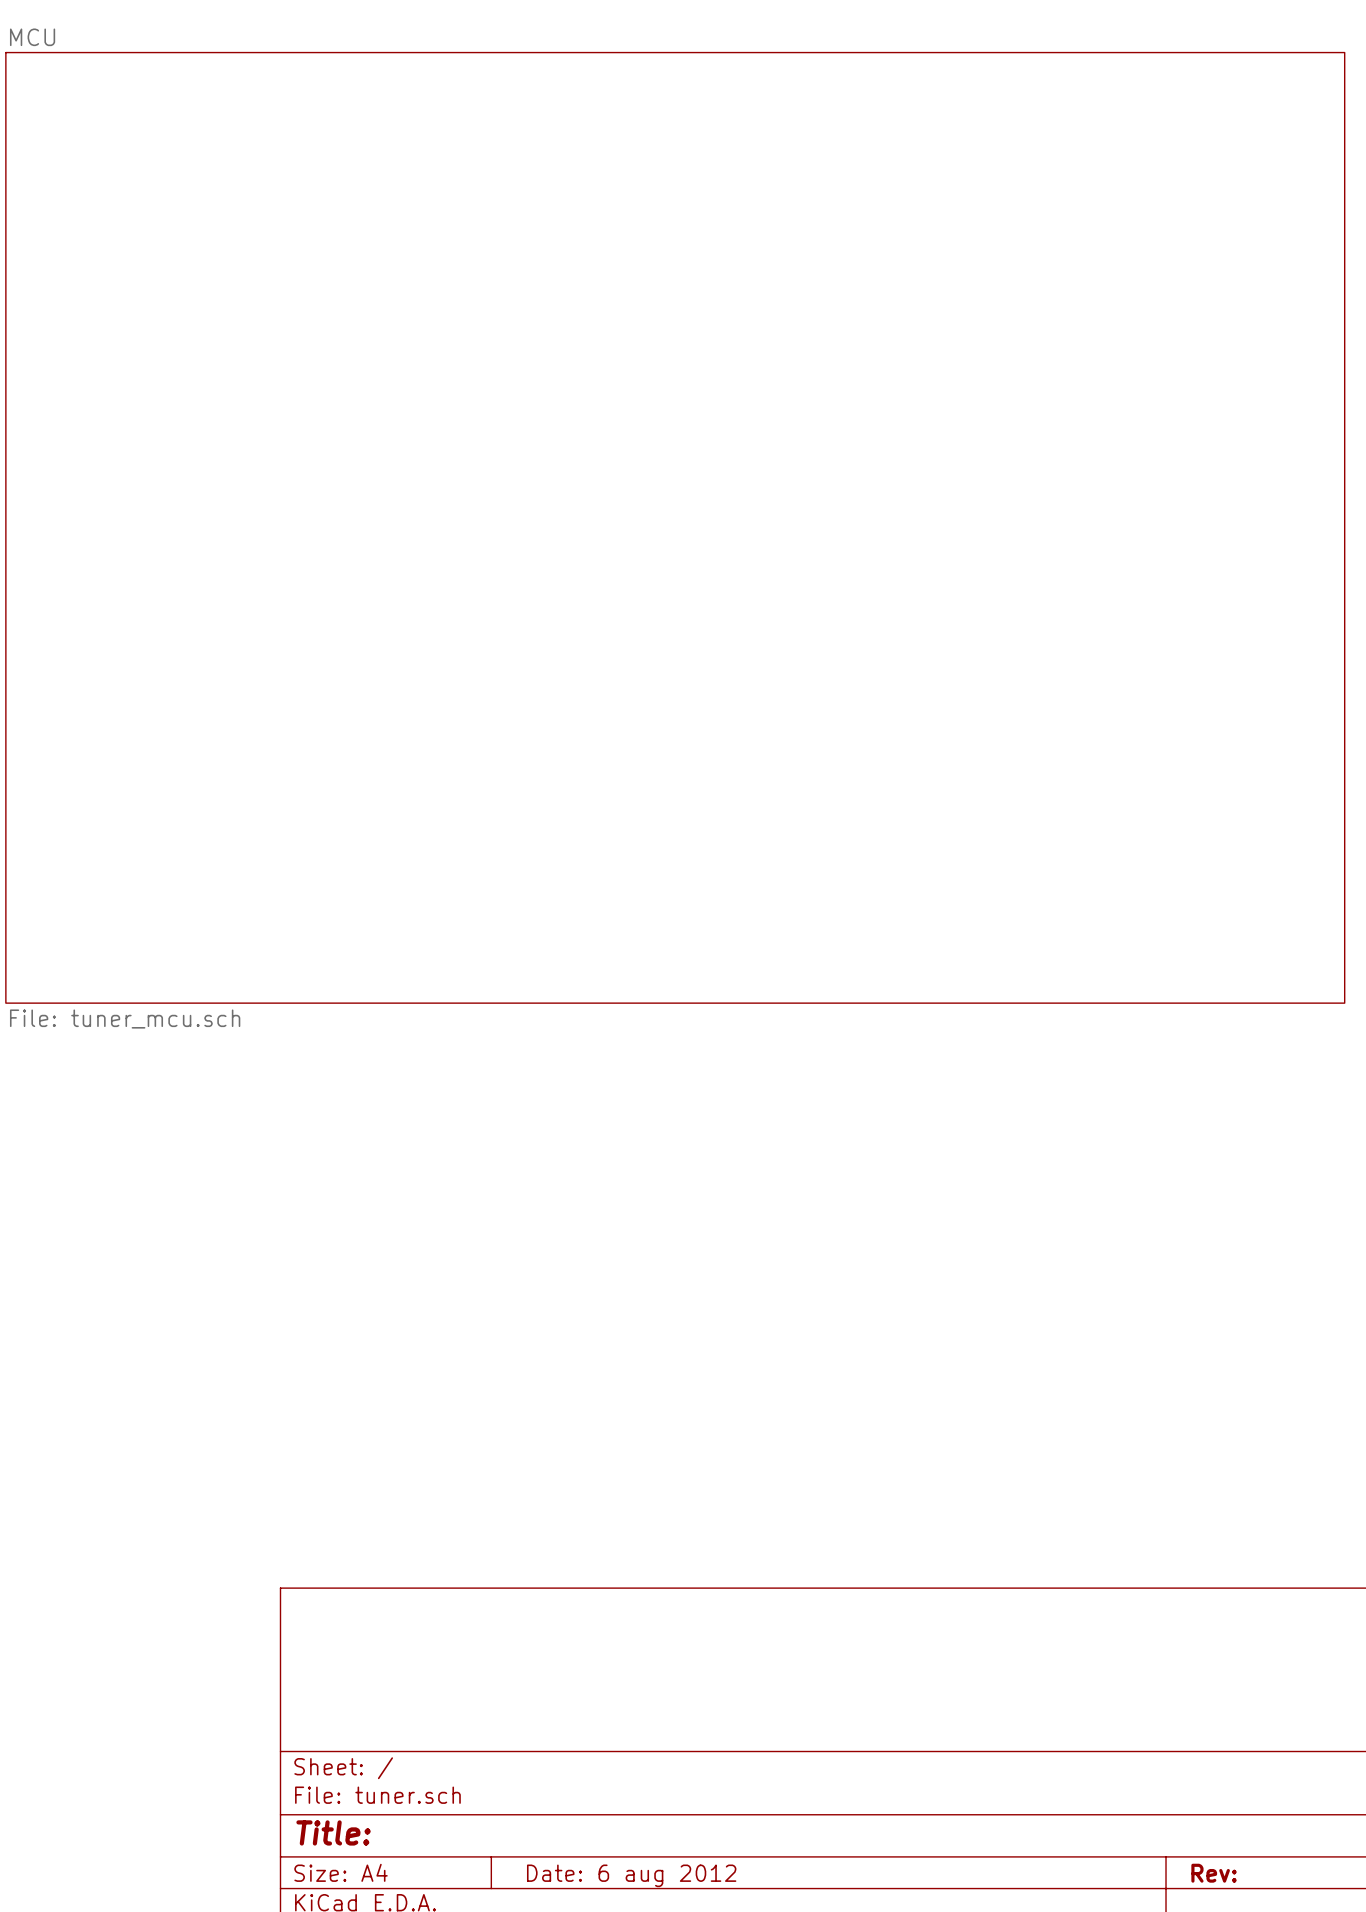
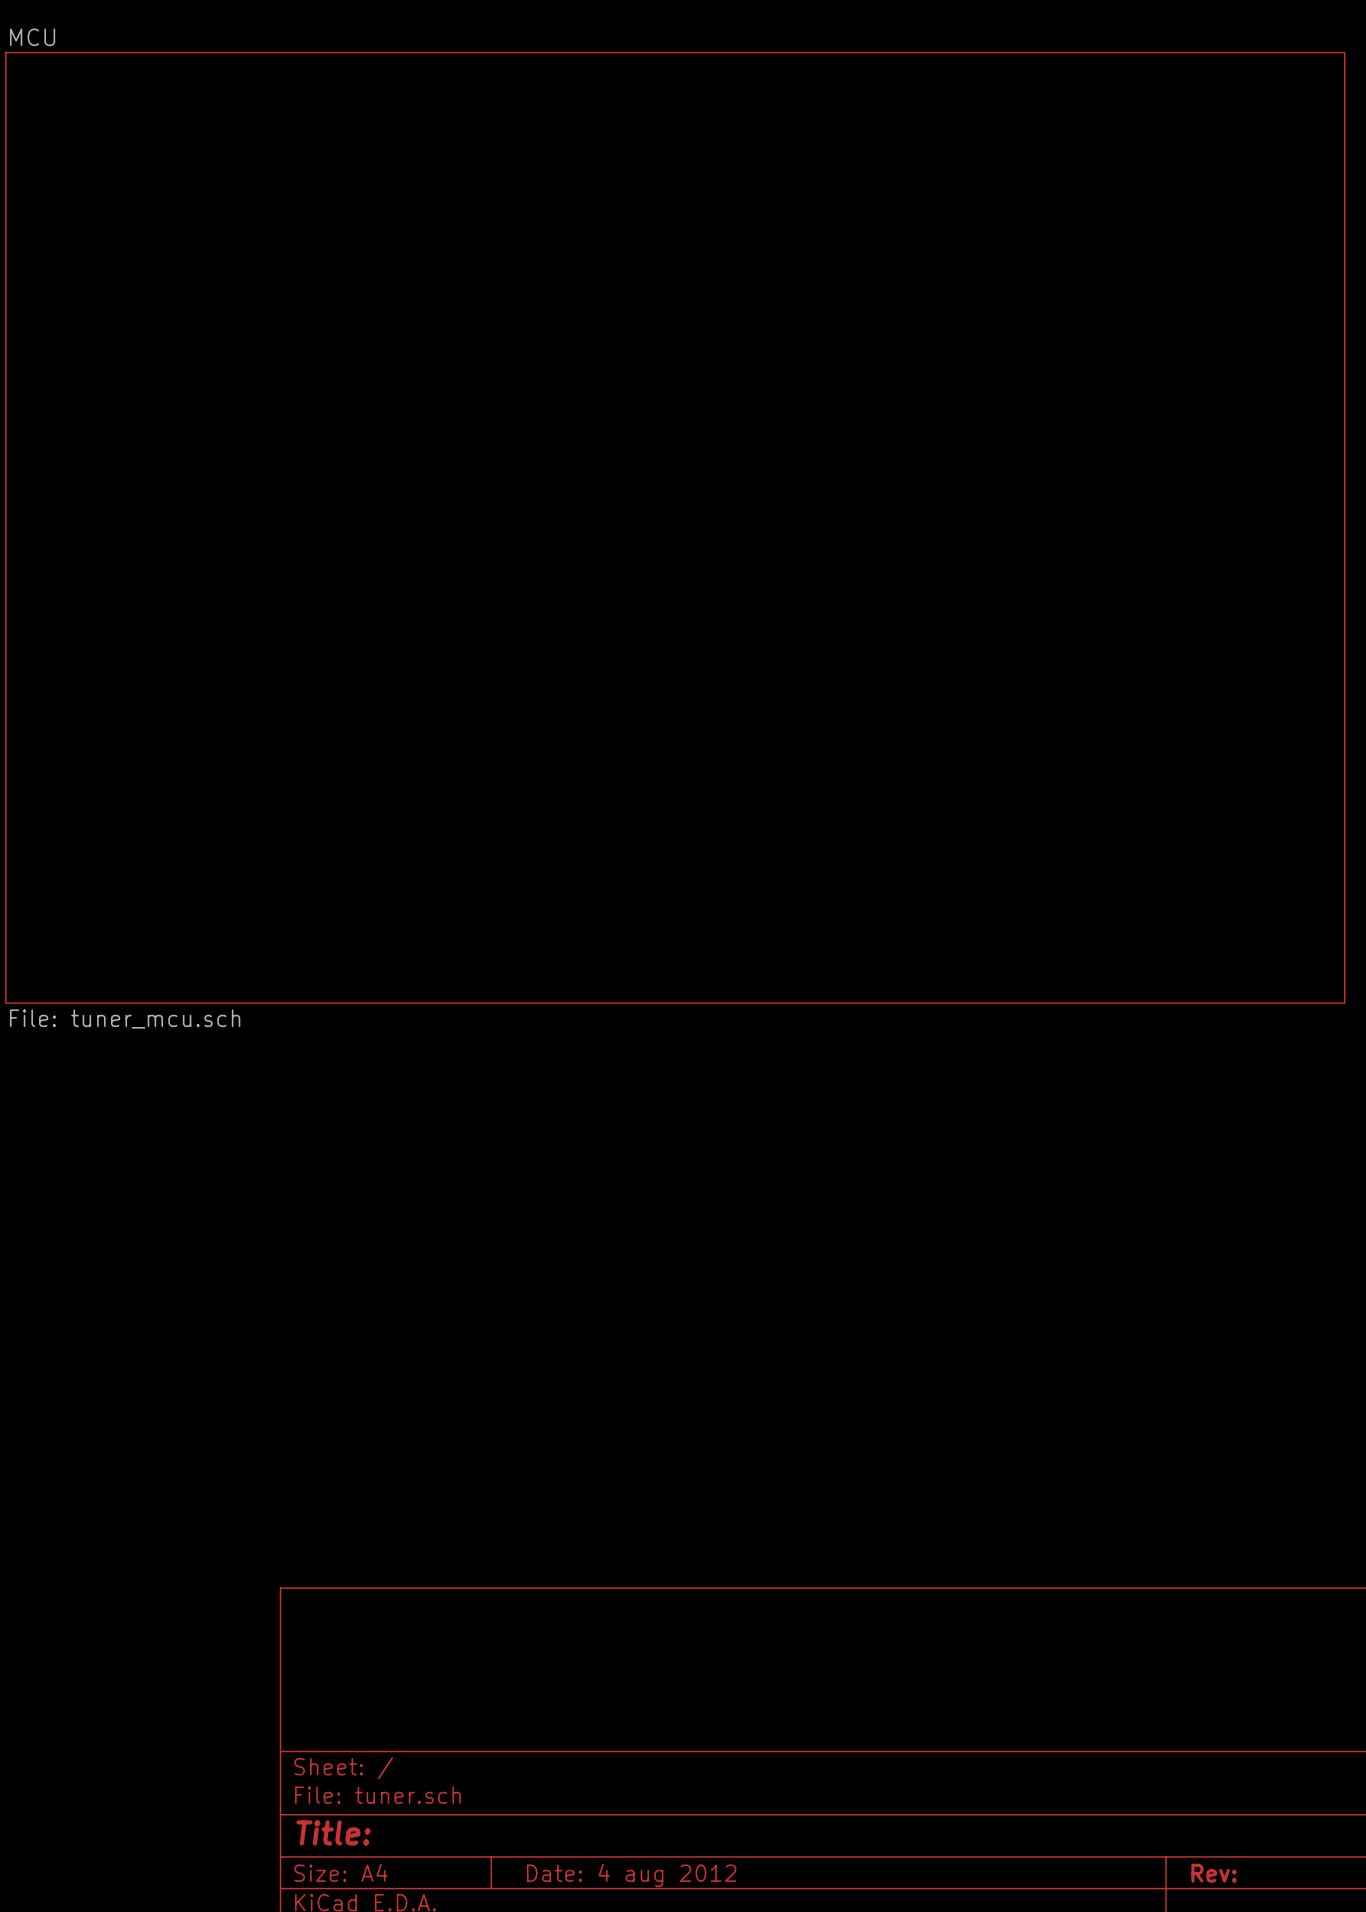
title block: Date: 6 aug 2012 (631, 1875) -> Date: 4 aug 2012 (631, 1875)

